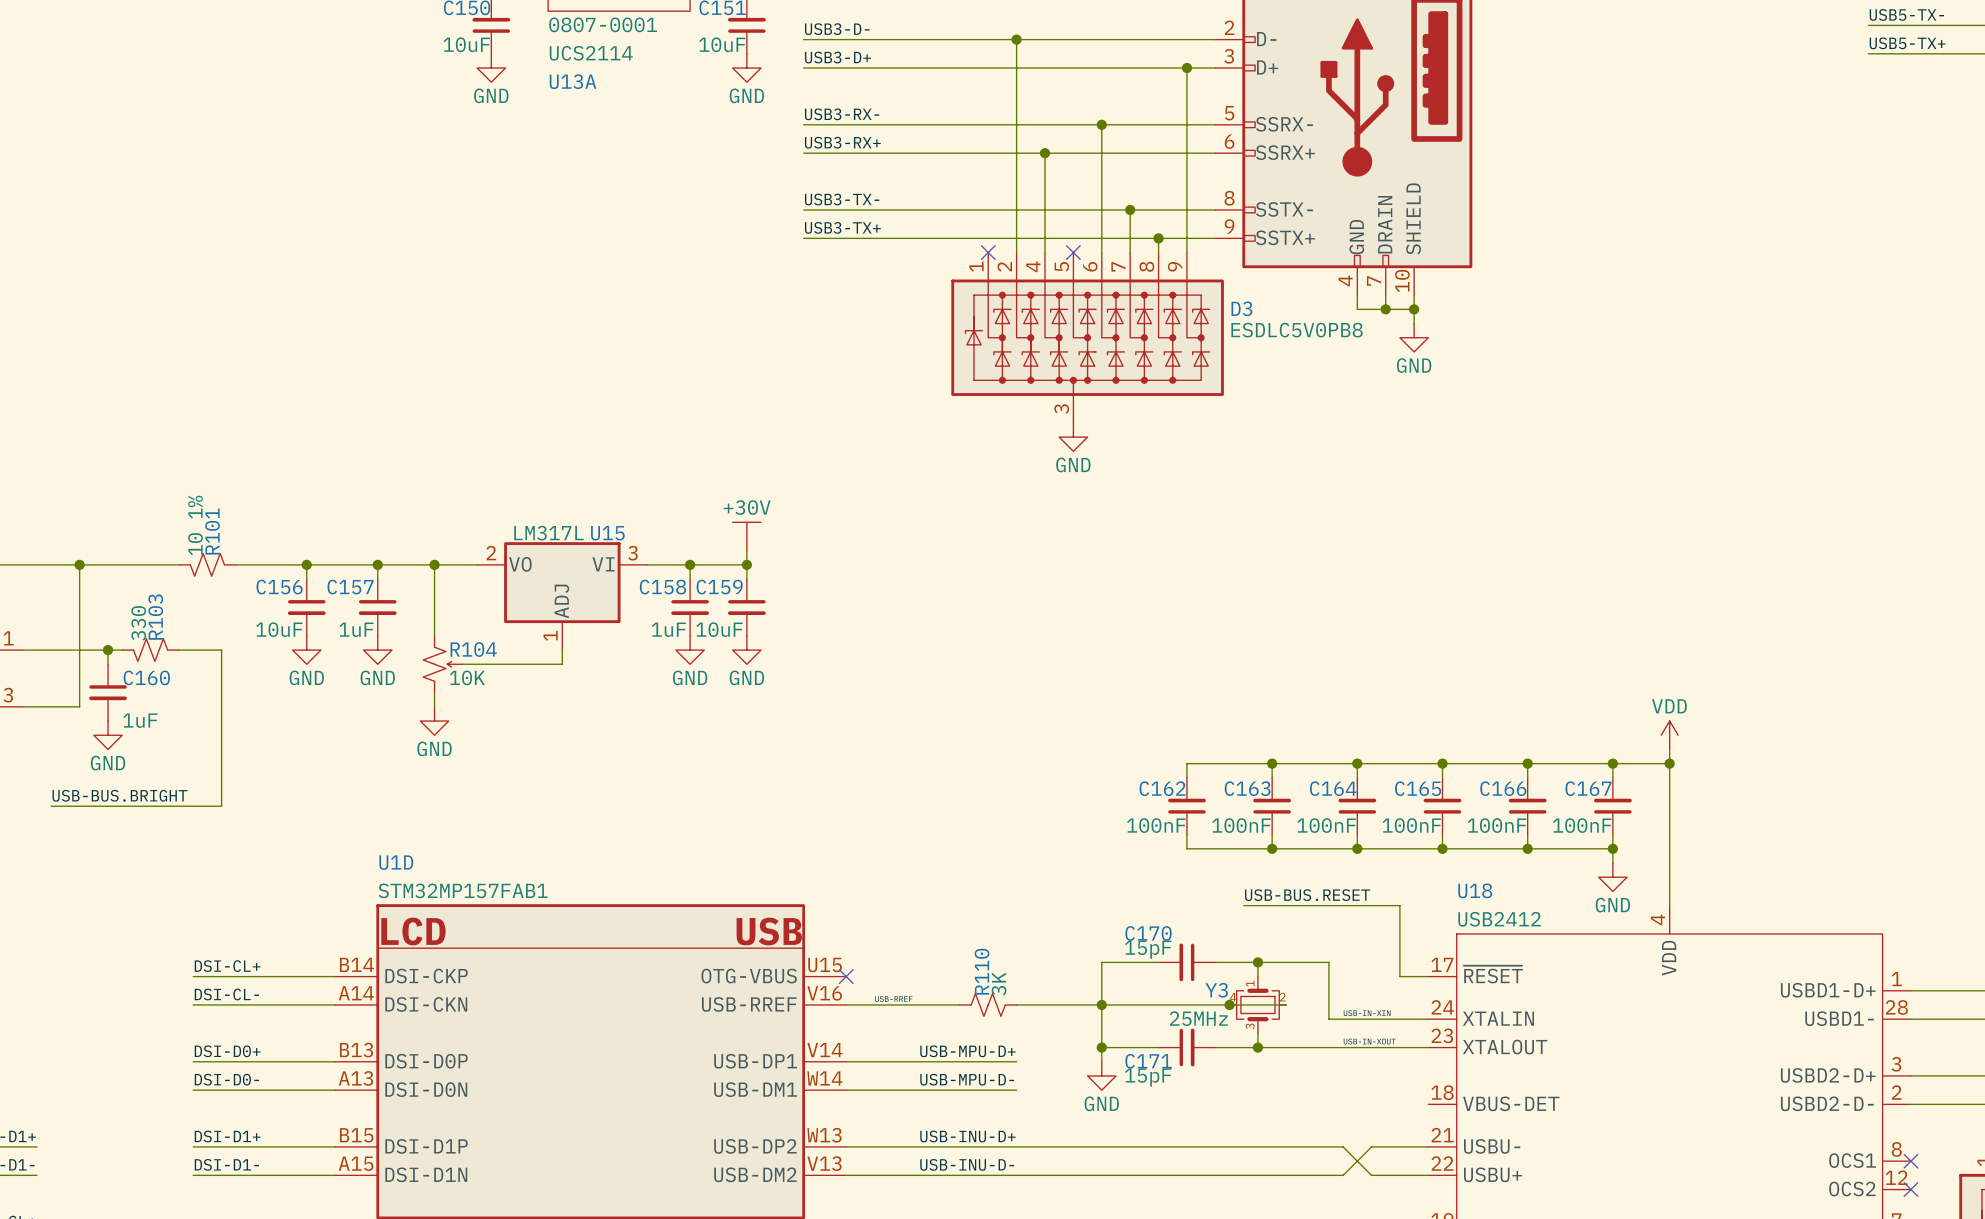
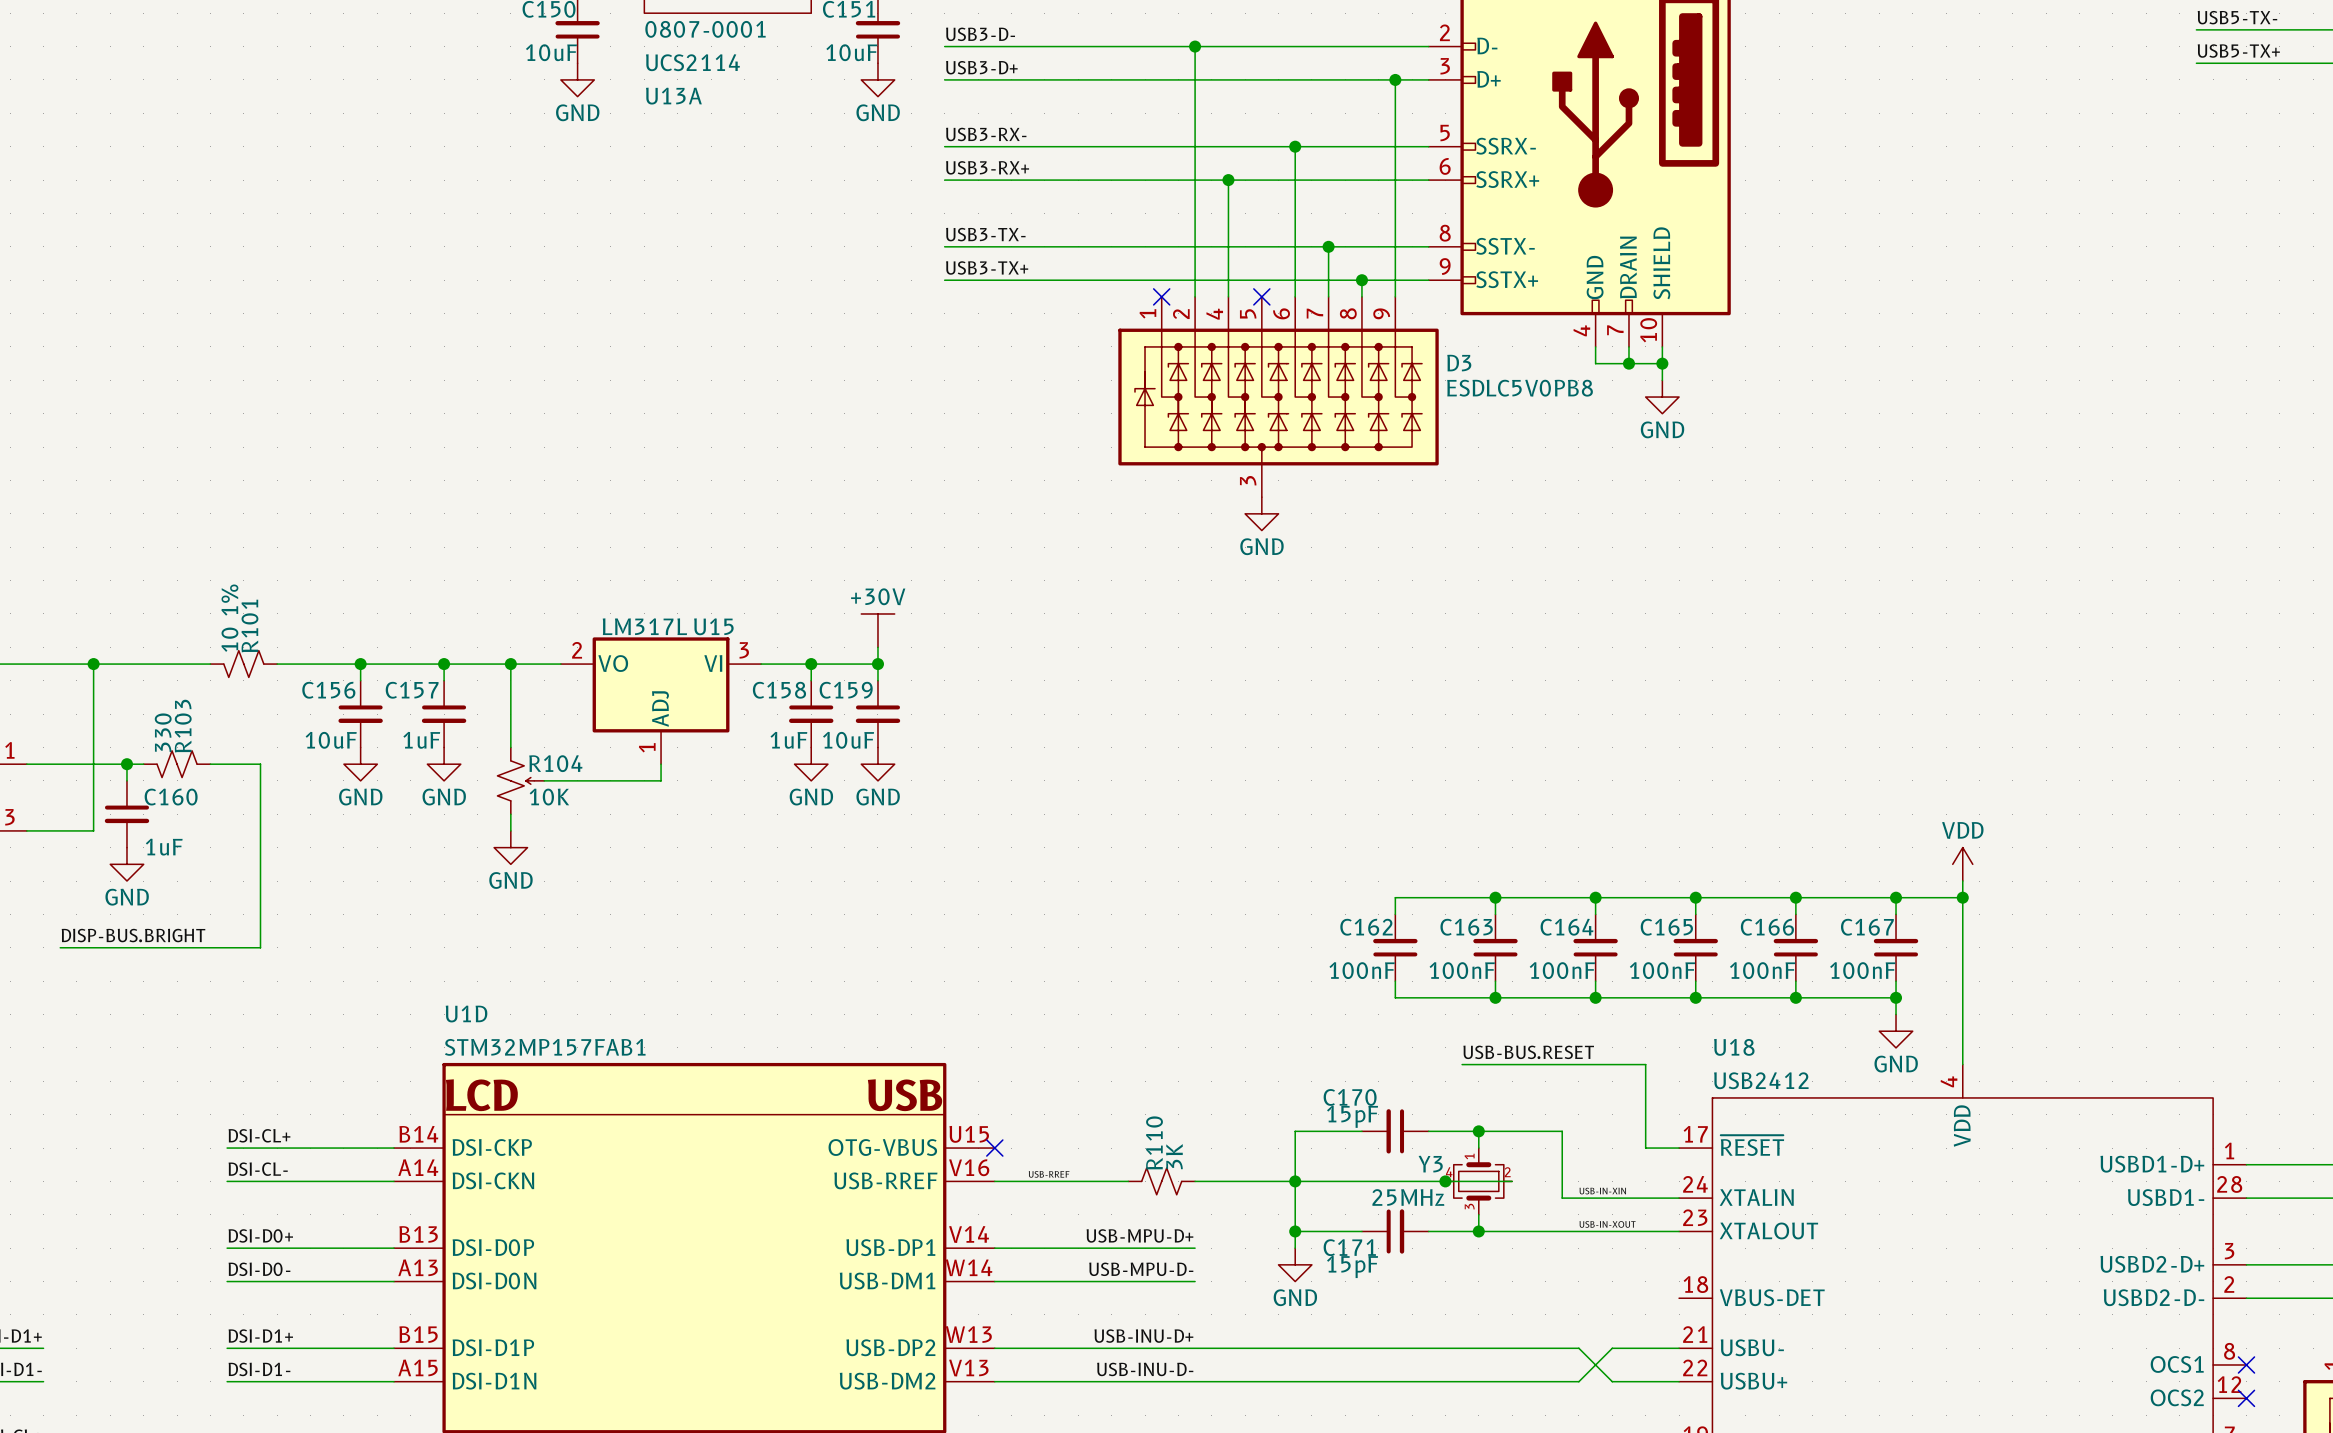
label: USB-BUS.BRIGHT (120, 795) -> DISP-BUS.BRIGHT (133, 935)

